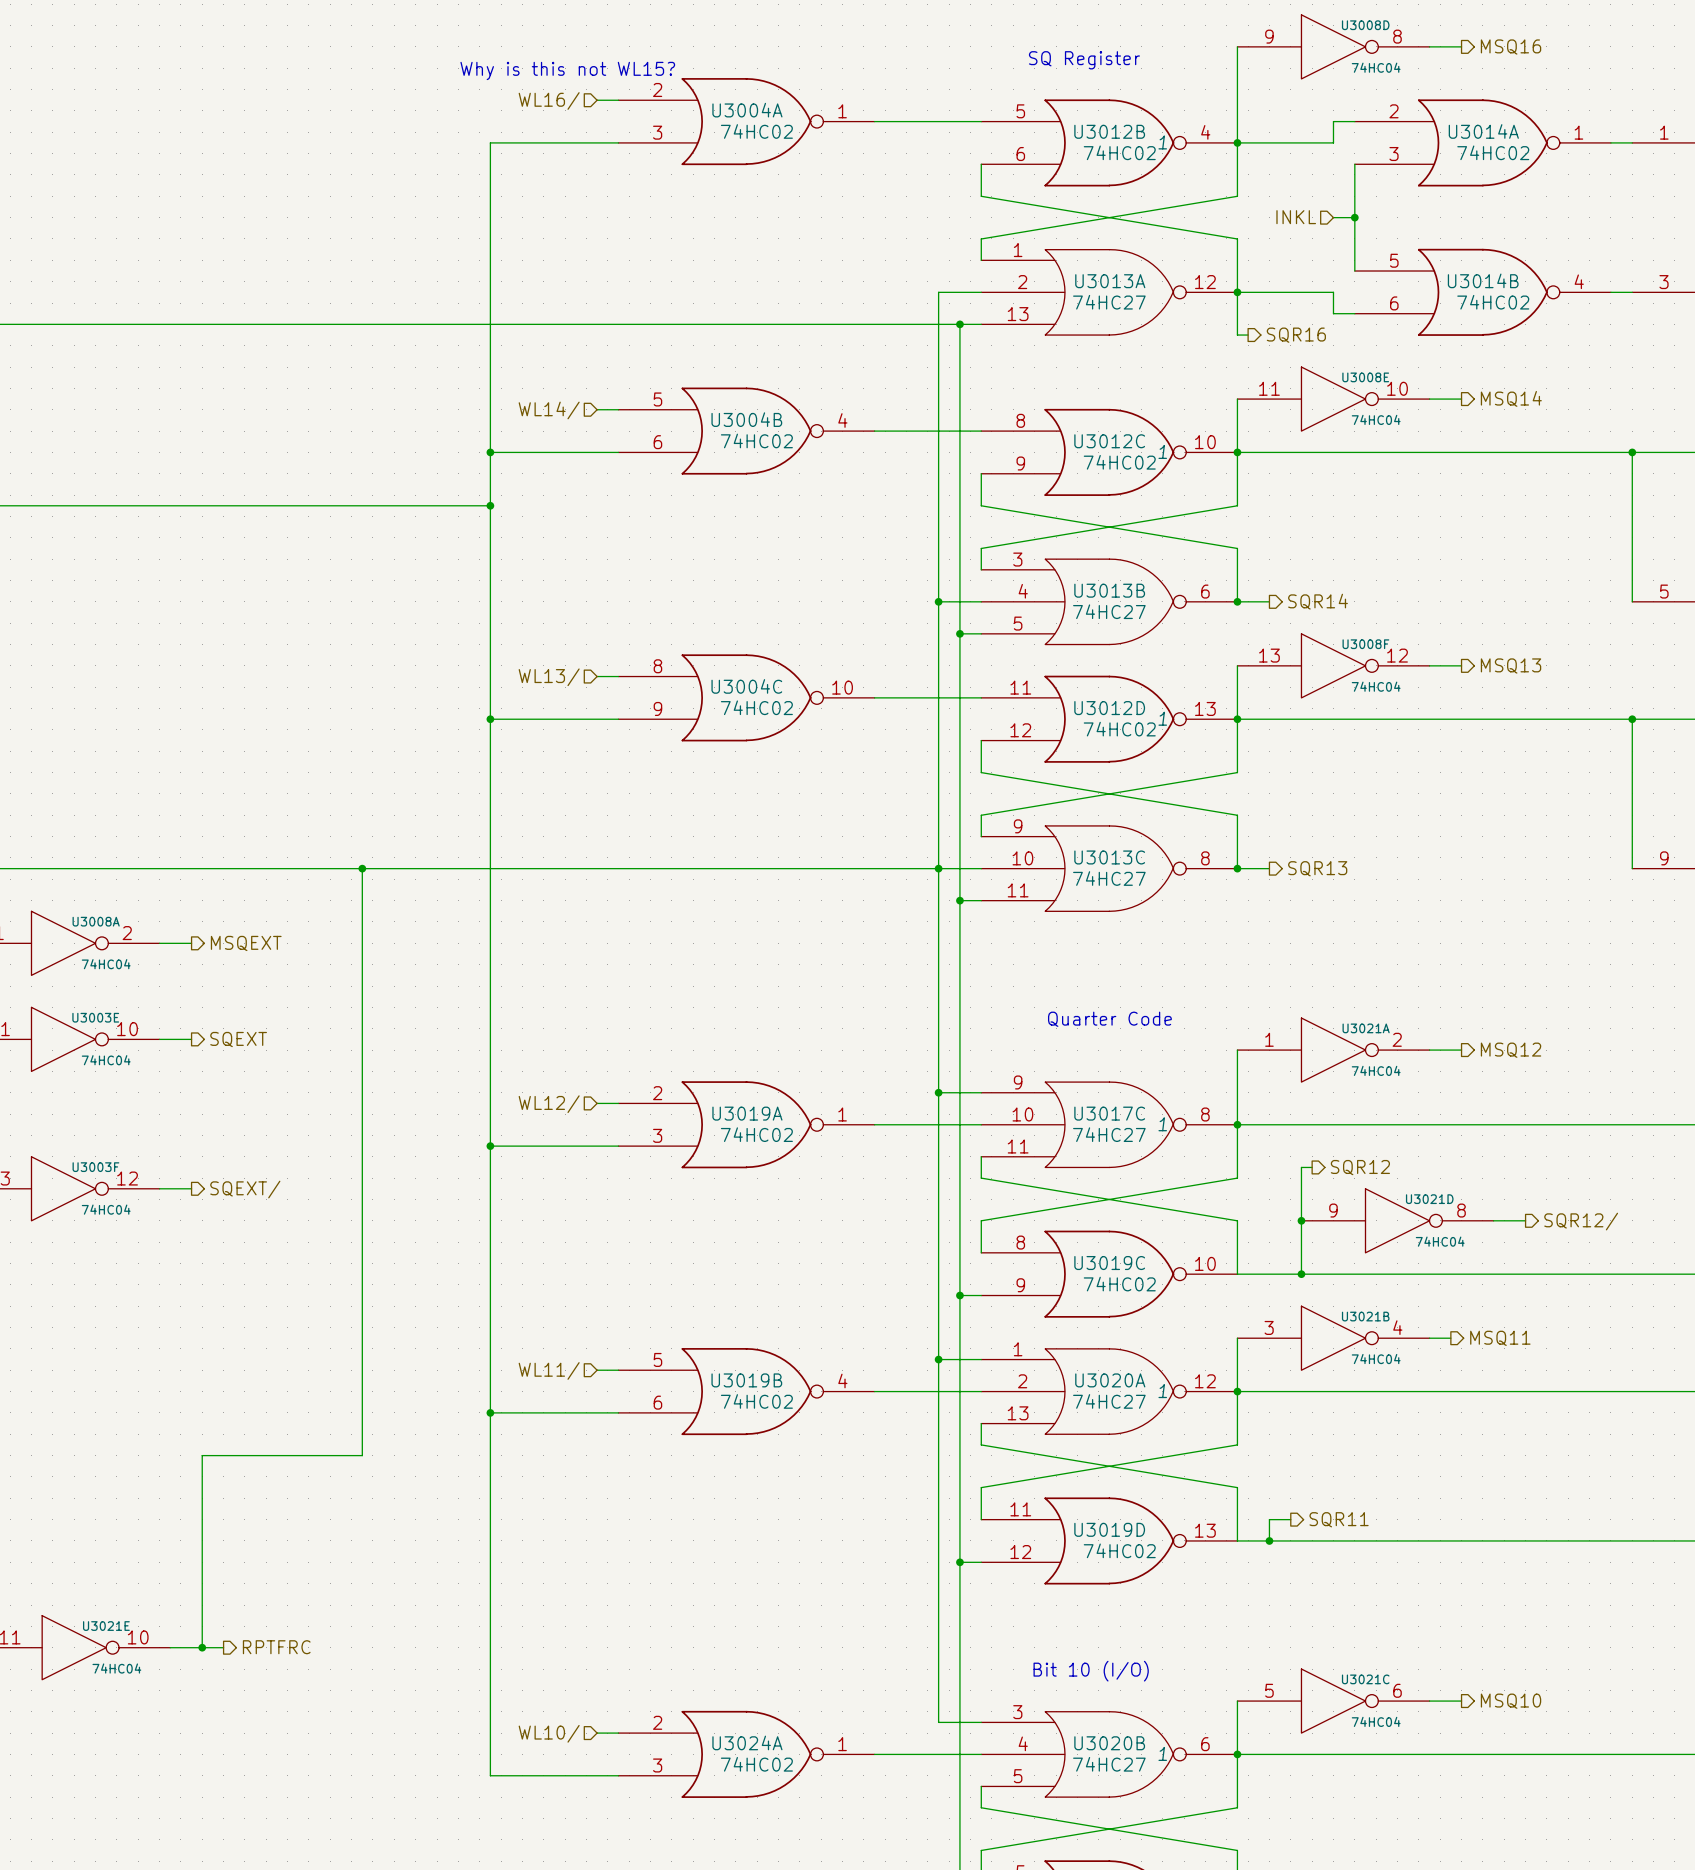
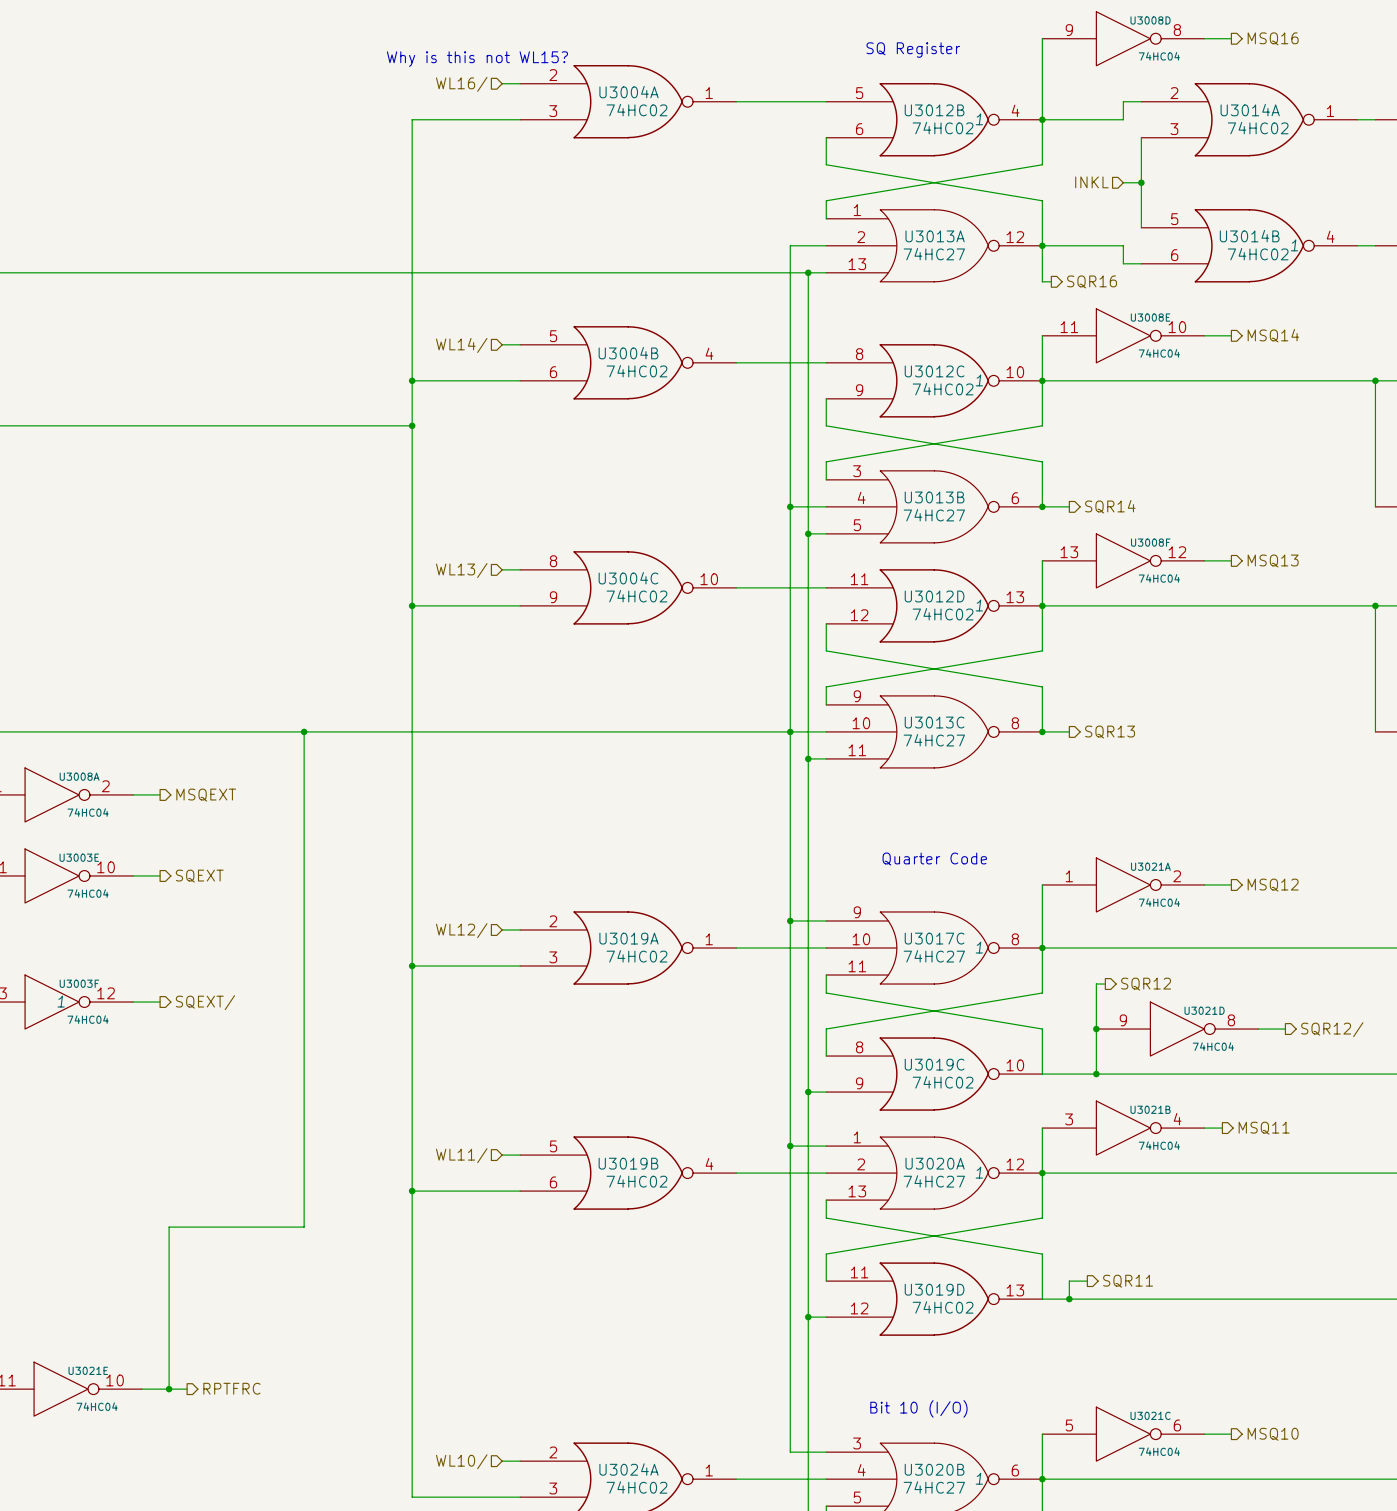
U3014B text: none -> 1 (1294, 245)
U3003F text: none -> 1 (61, 1001)

